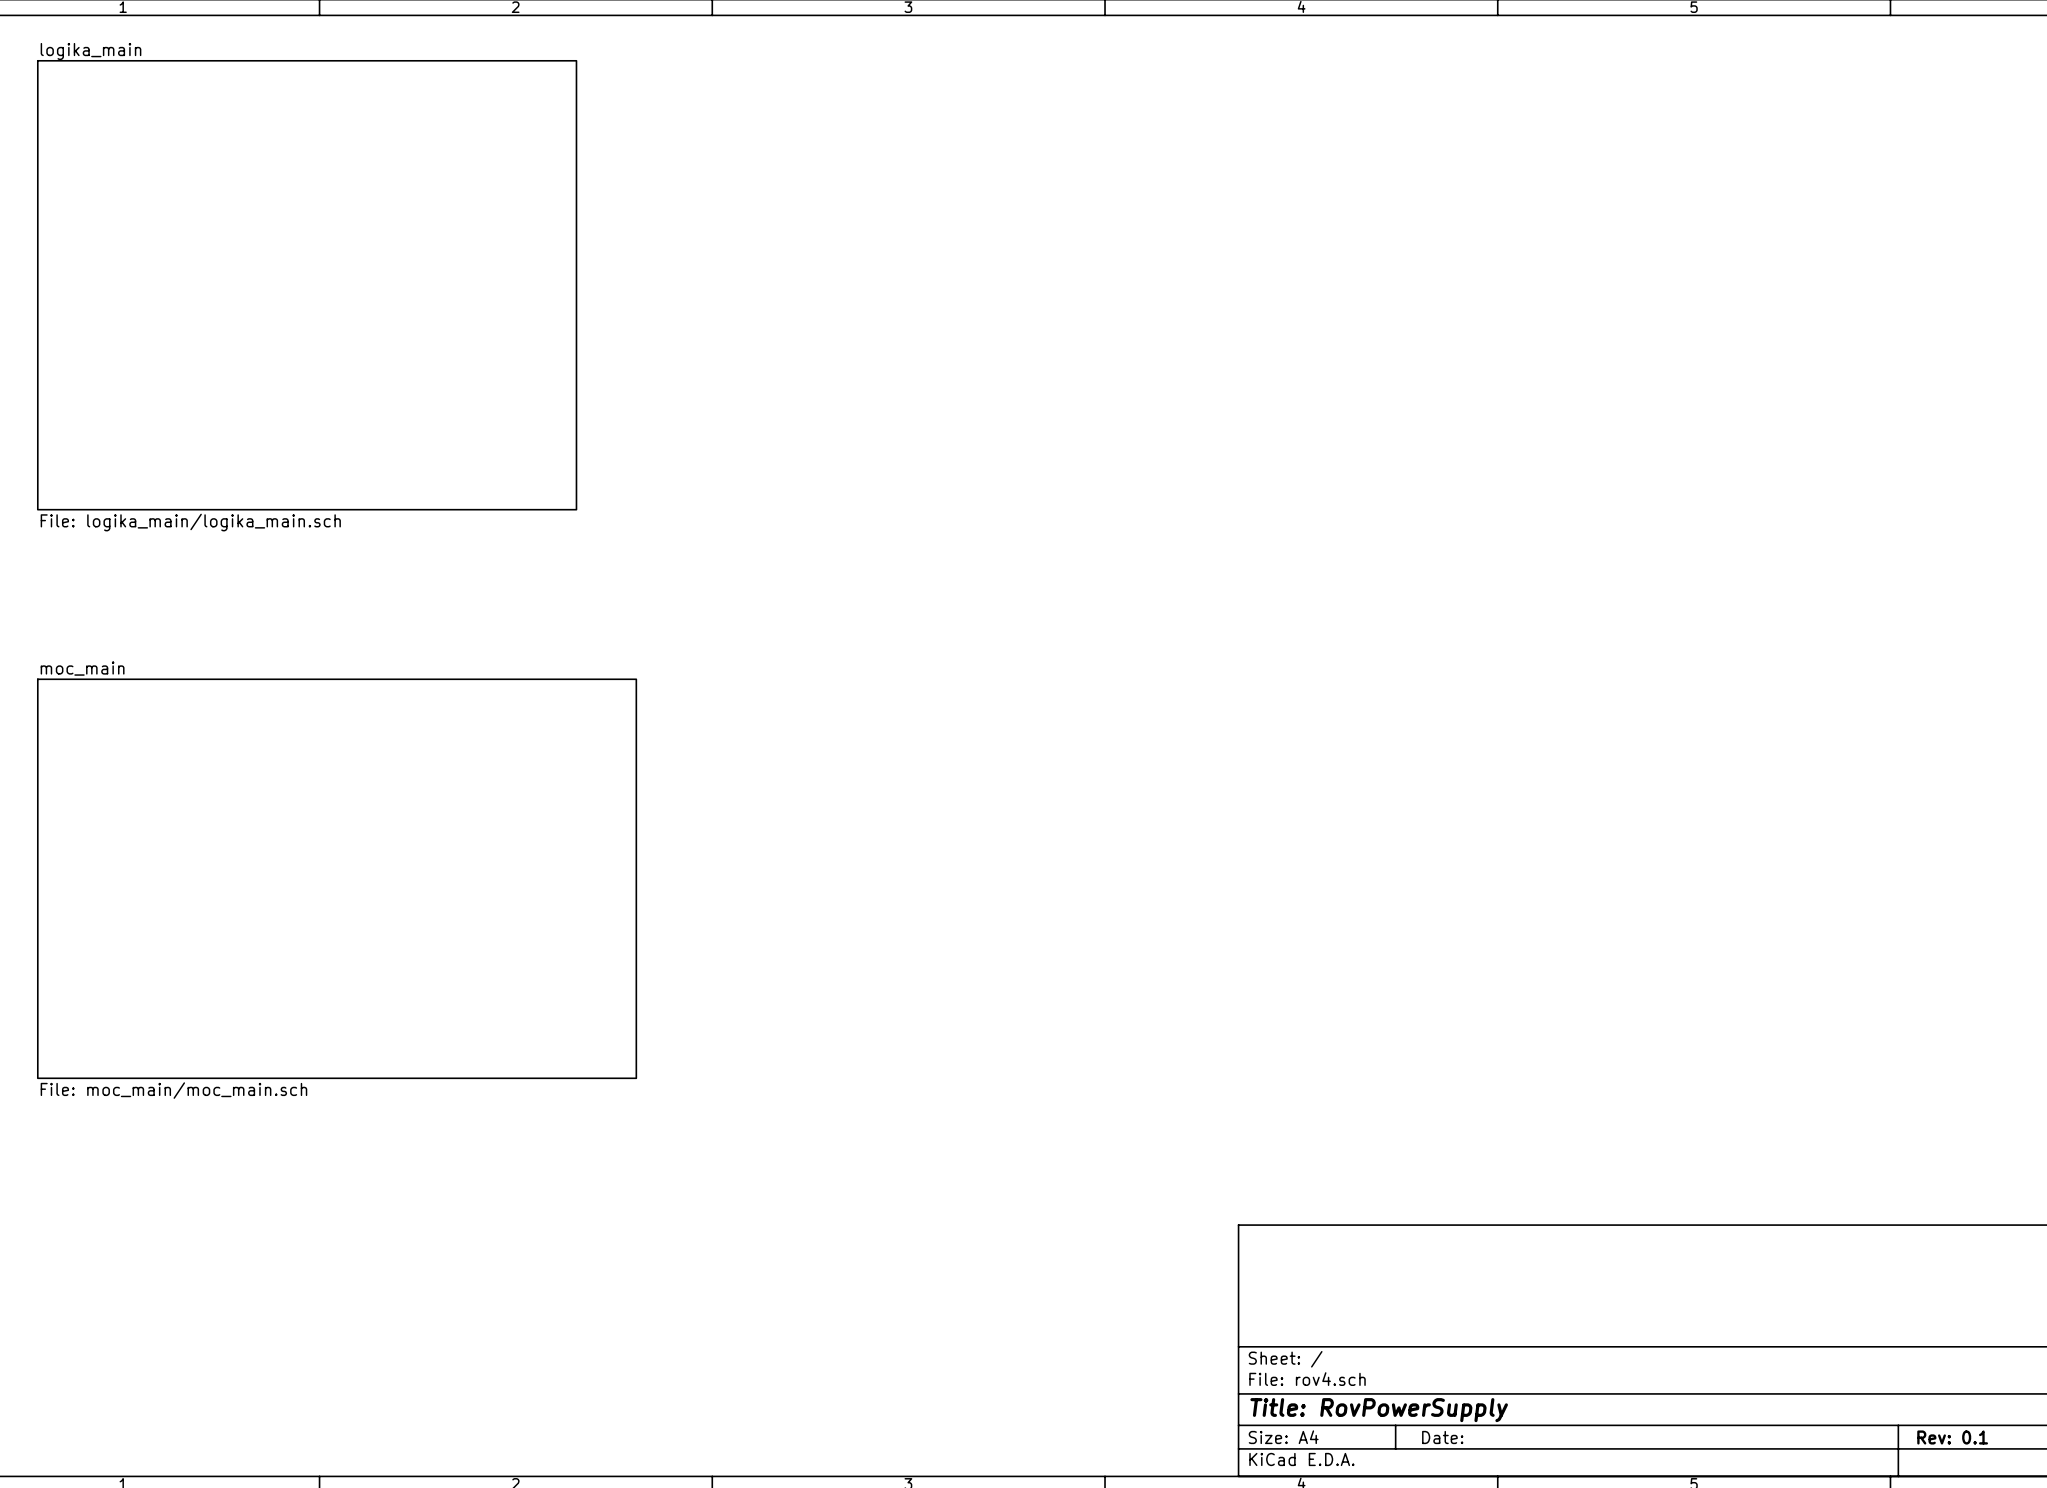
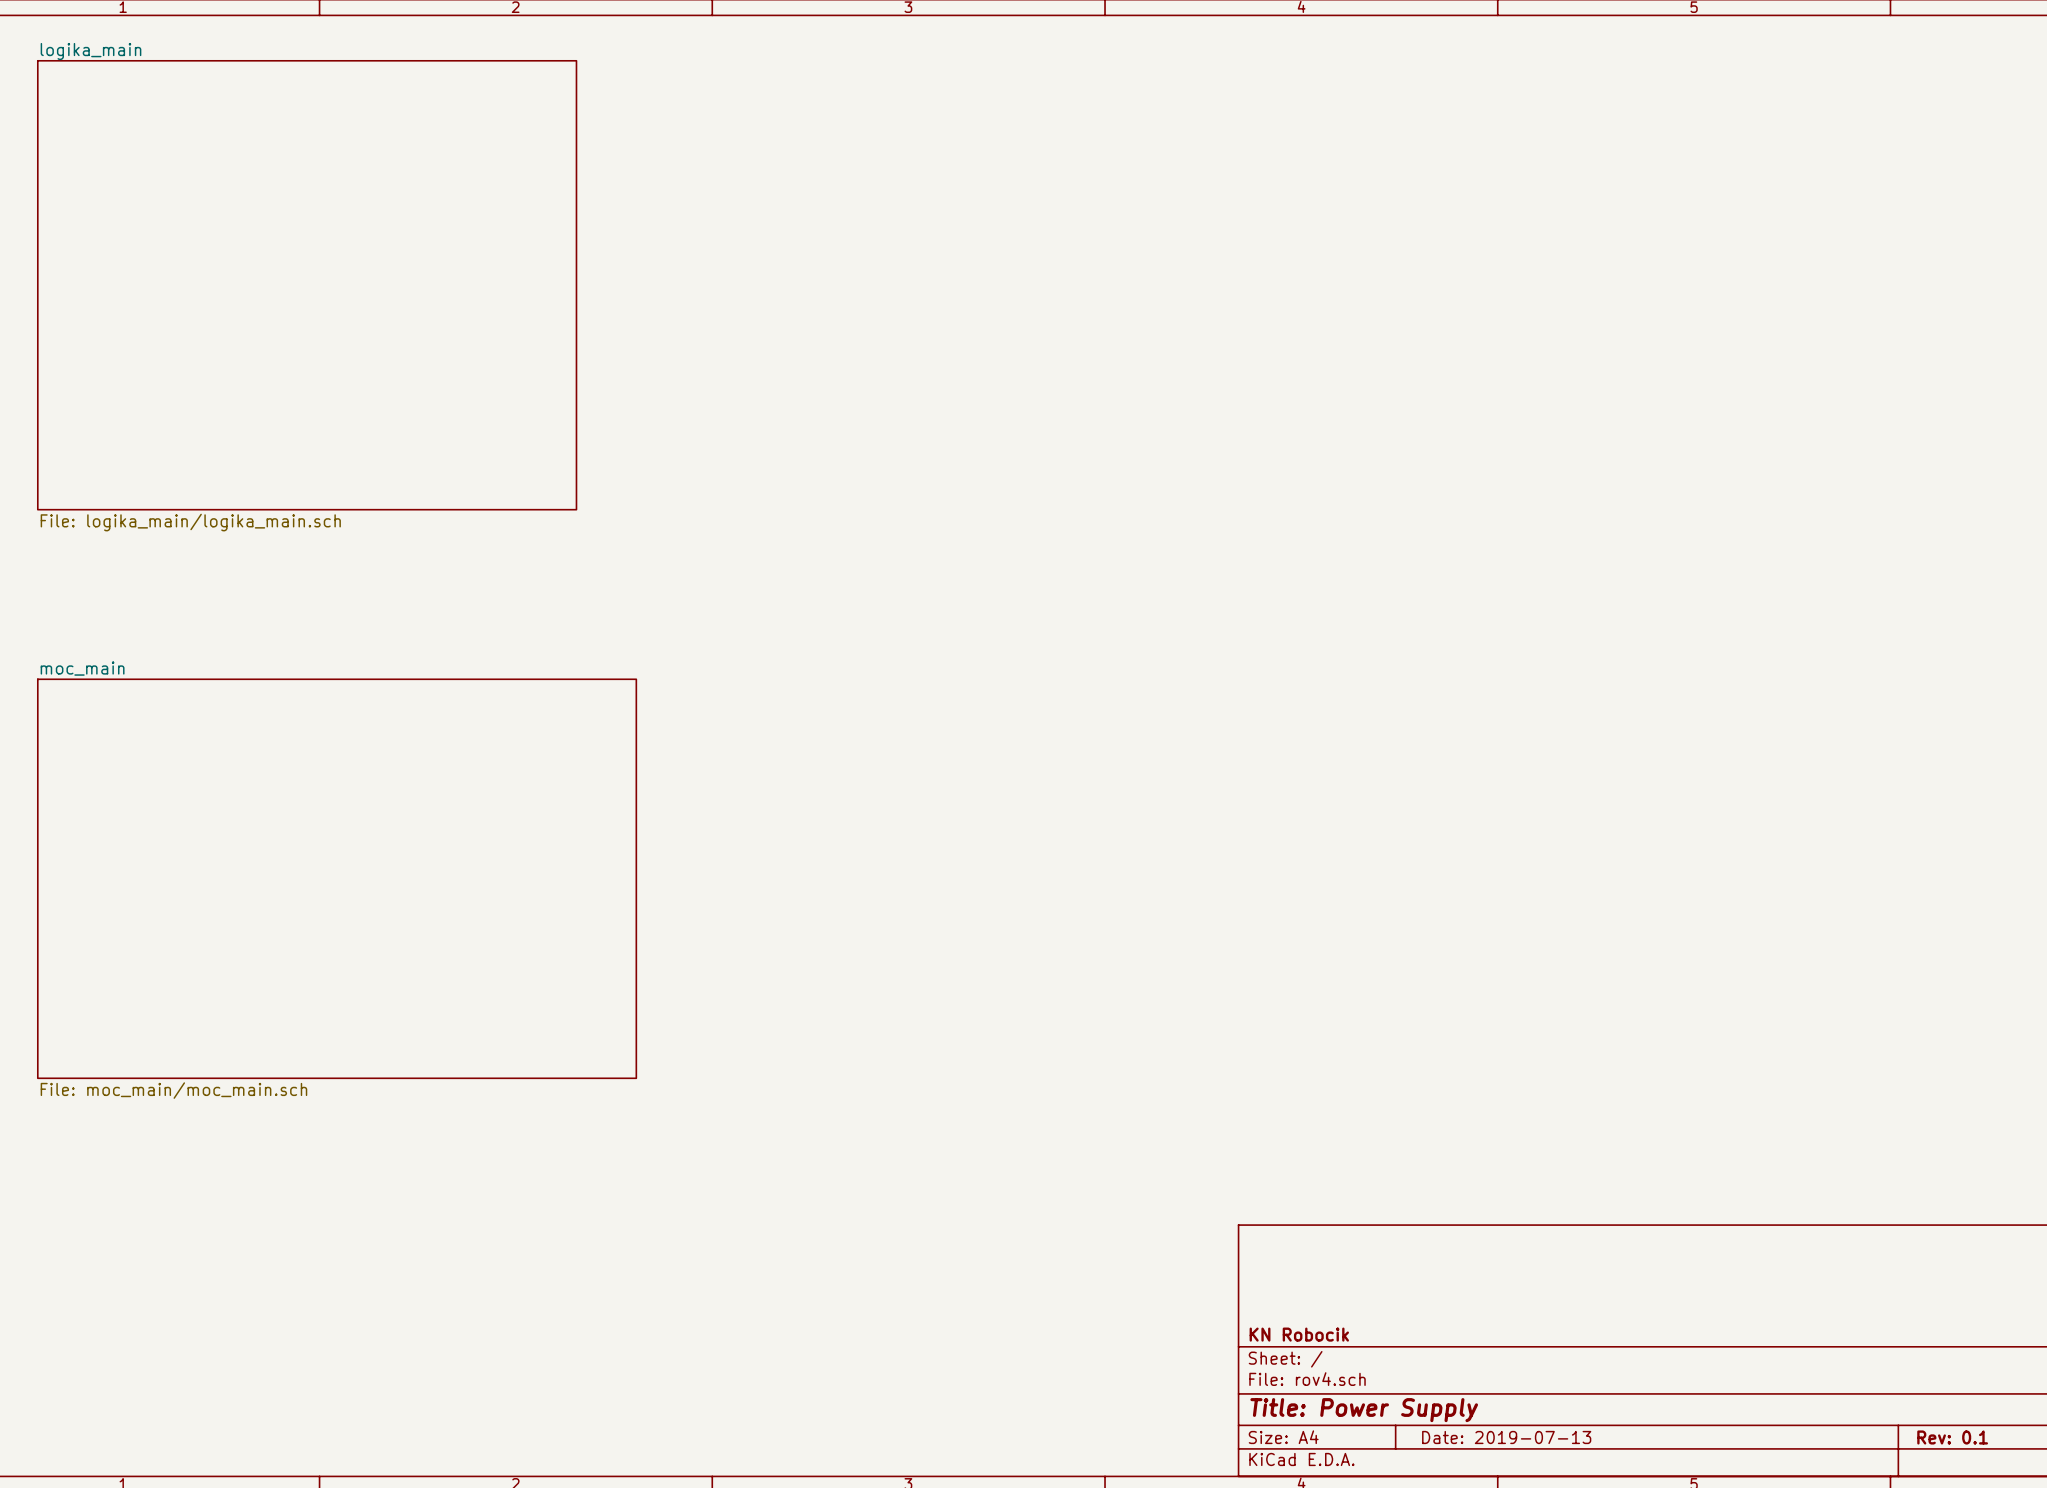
title block: none -> KN Robocik (1299, 1334)
title block: Title: RovPowerSupply (1379, 1410) -> Title: Power Supply (1364, 1410)
title block: Date: (1442, 1437) -> Date: 2019-07-13 (1506, 1437)

